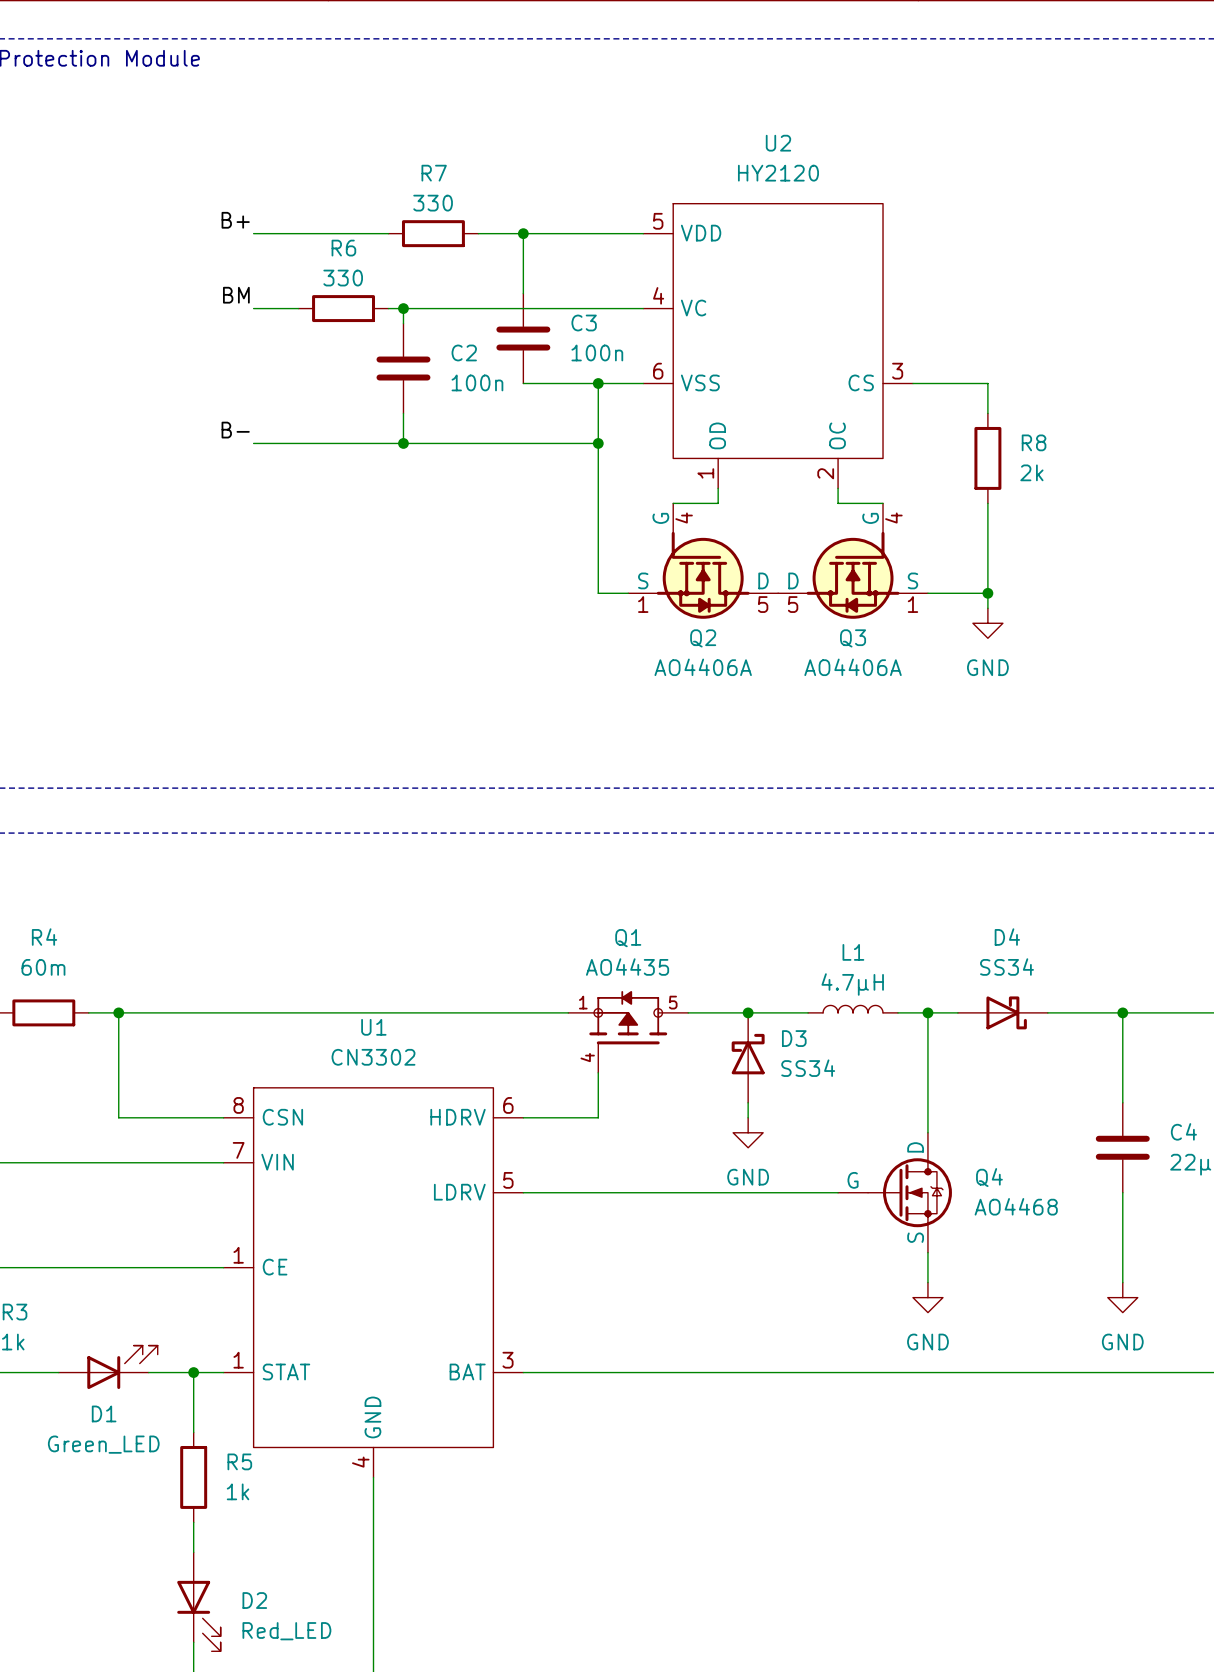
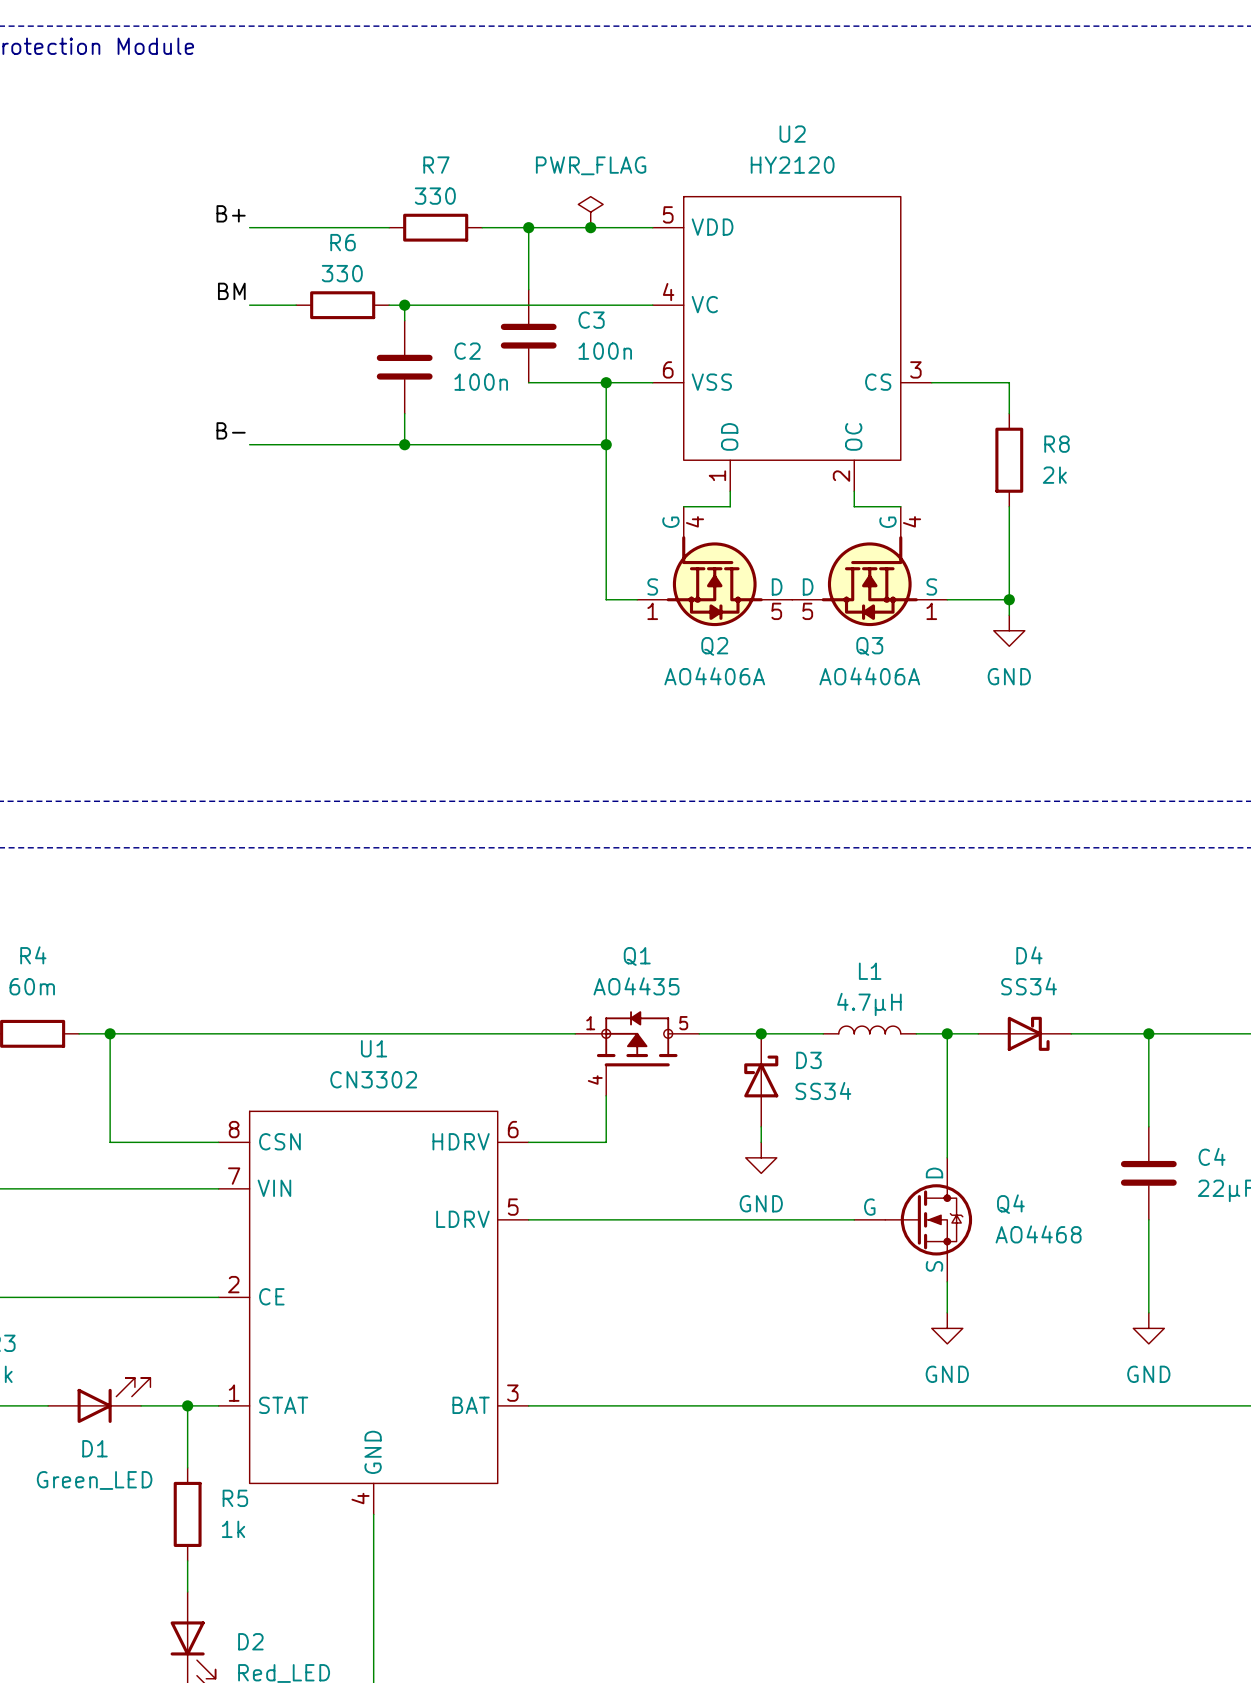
power symbol: none -> PWR_FLAG (590, 212)
junction: none -> (590, 227)
U1 pin number: 1 (238, 1255) -> 2 (233, 1284)

